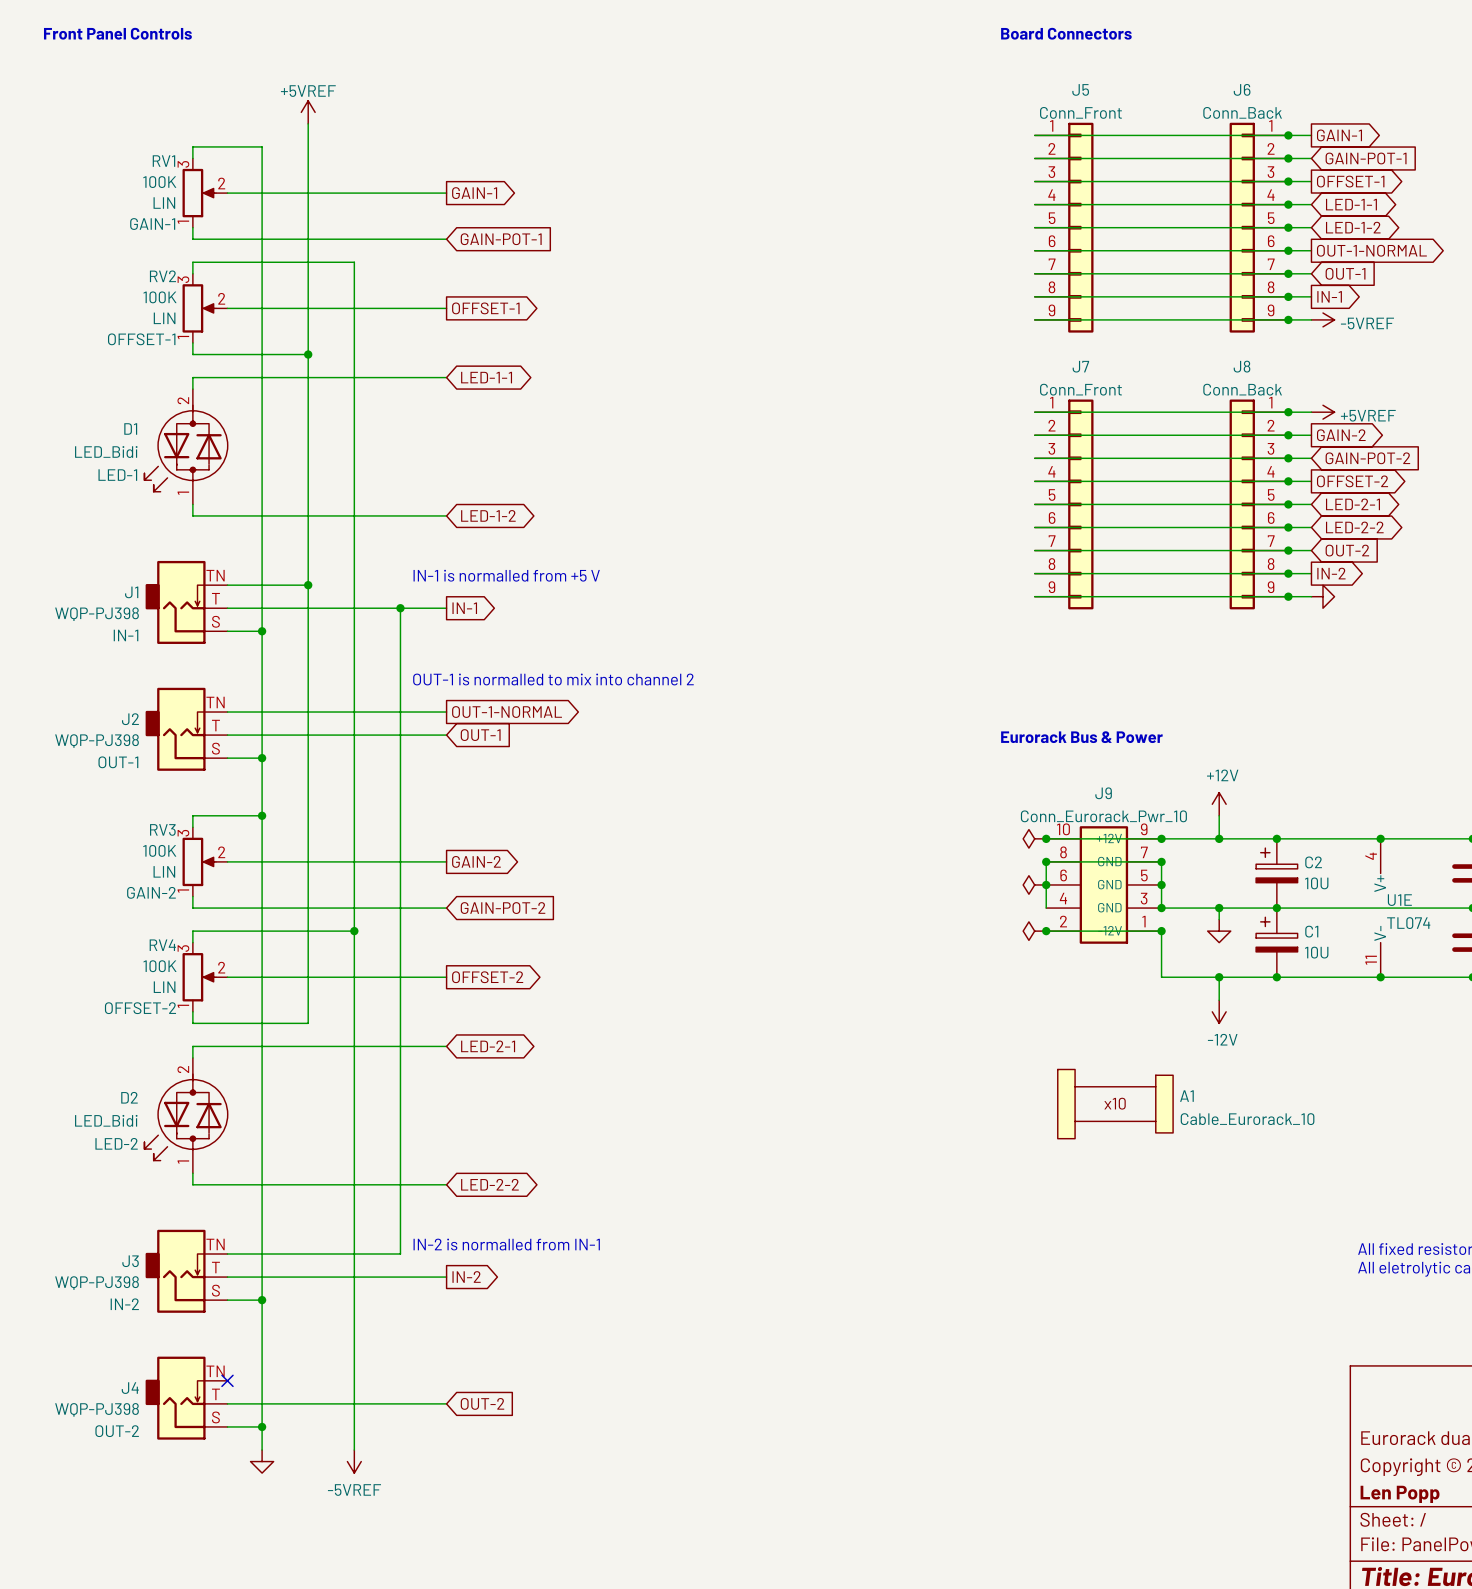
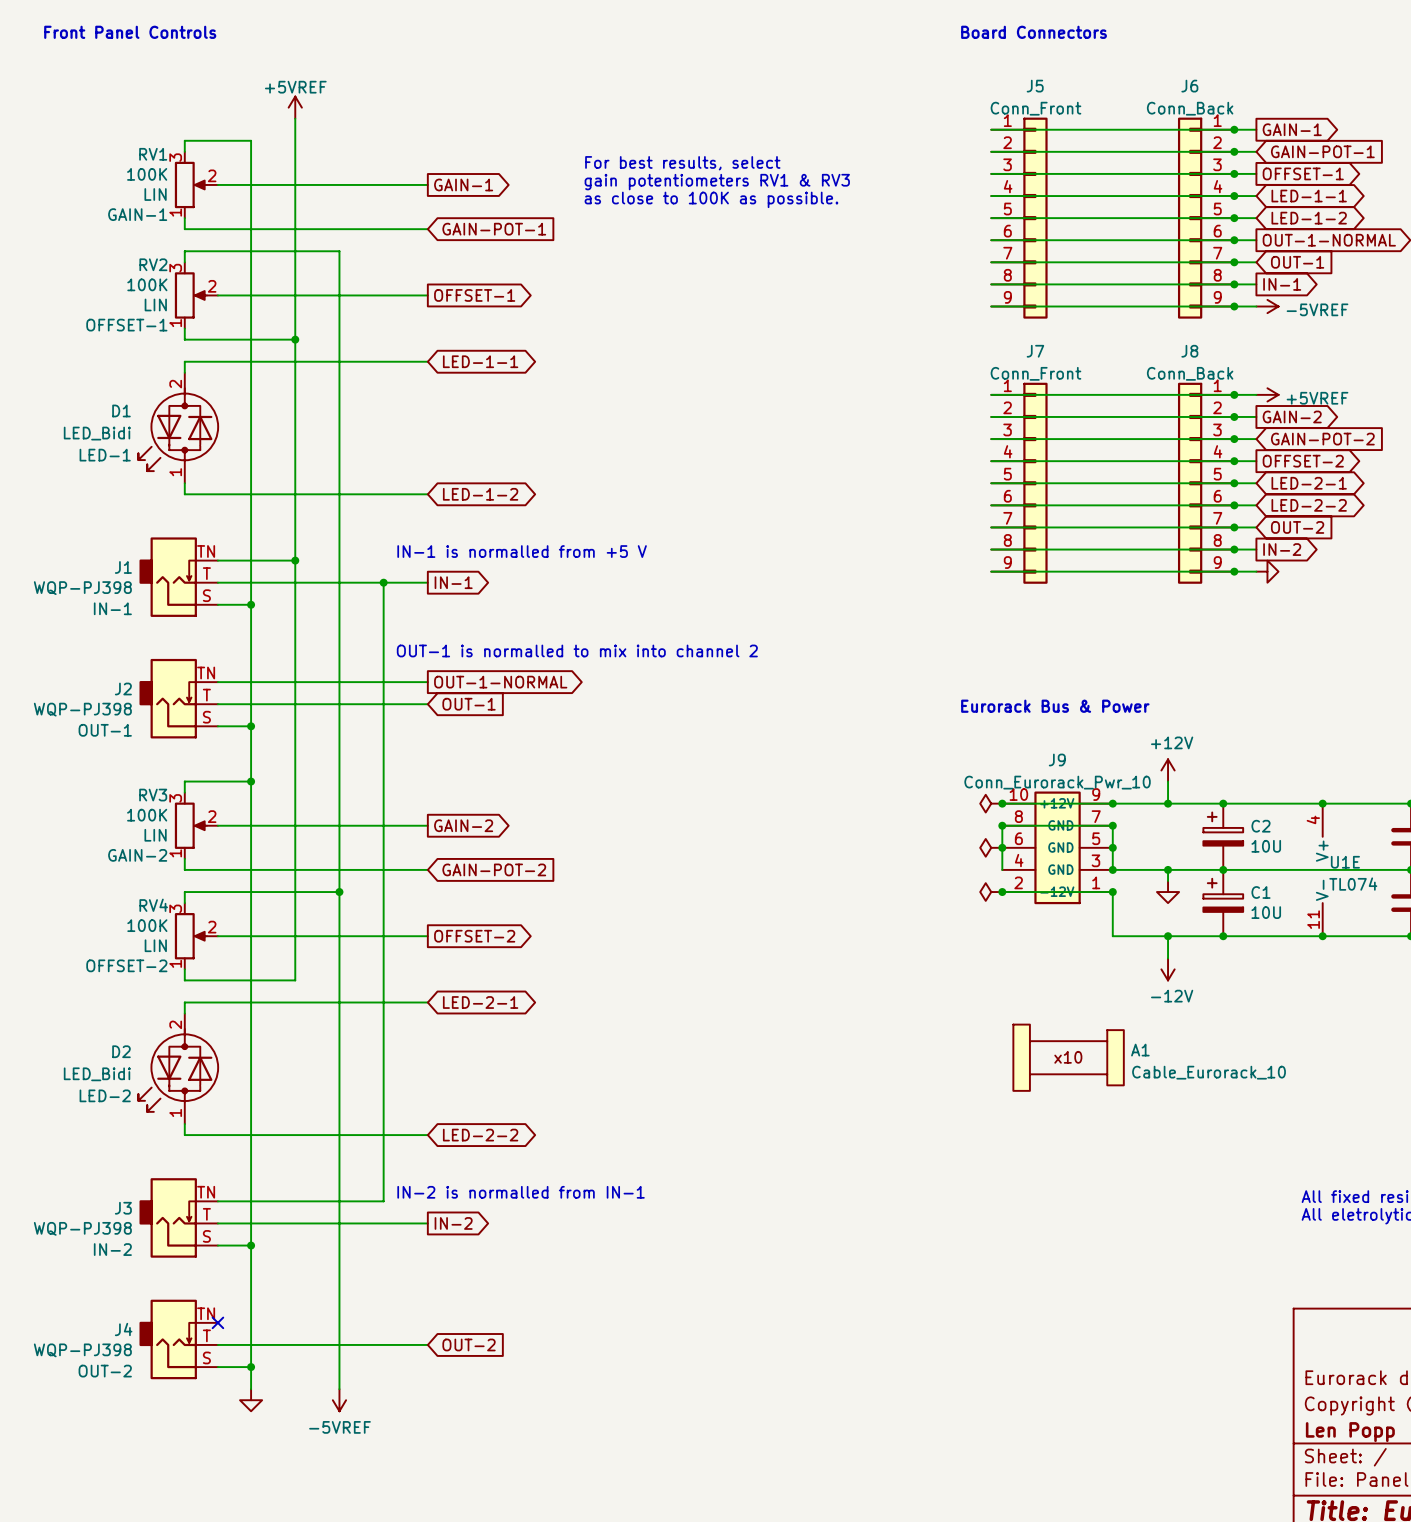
text: none -> For best results, select (682, 163)
text: none -> gain potentiometers RV1 & RV3 (717, 182)
text: none -> as close to 100K as possible. (711, 199)

